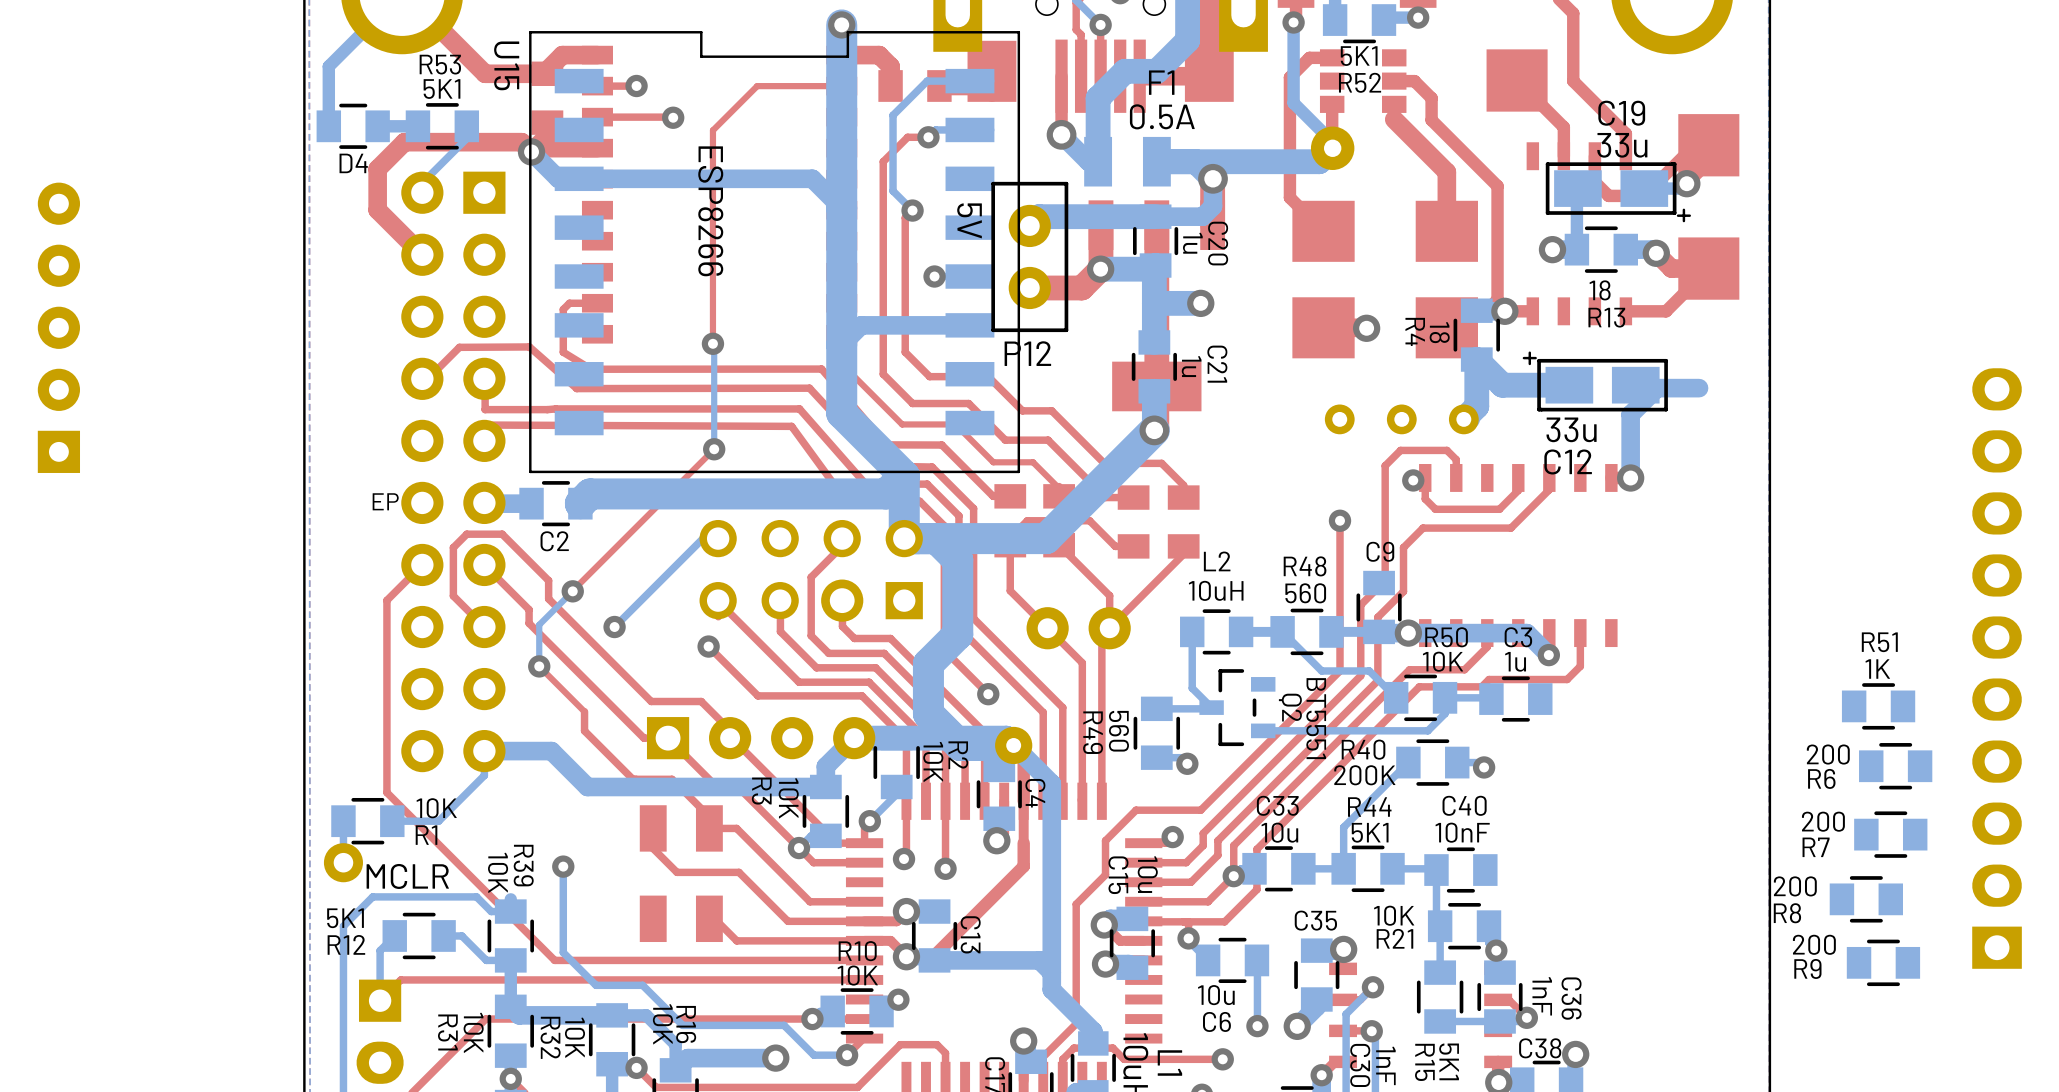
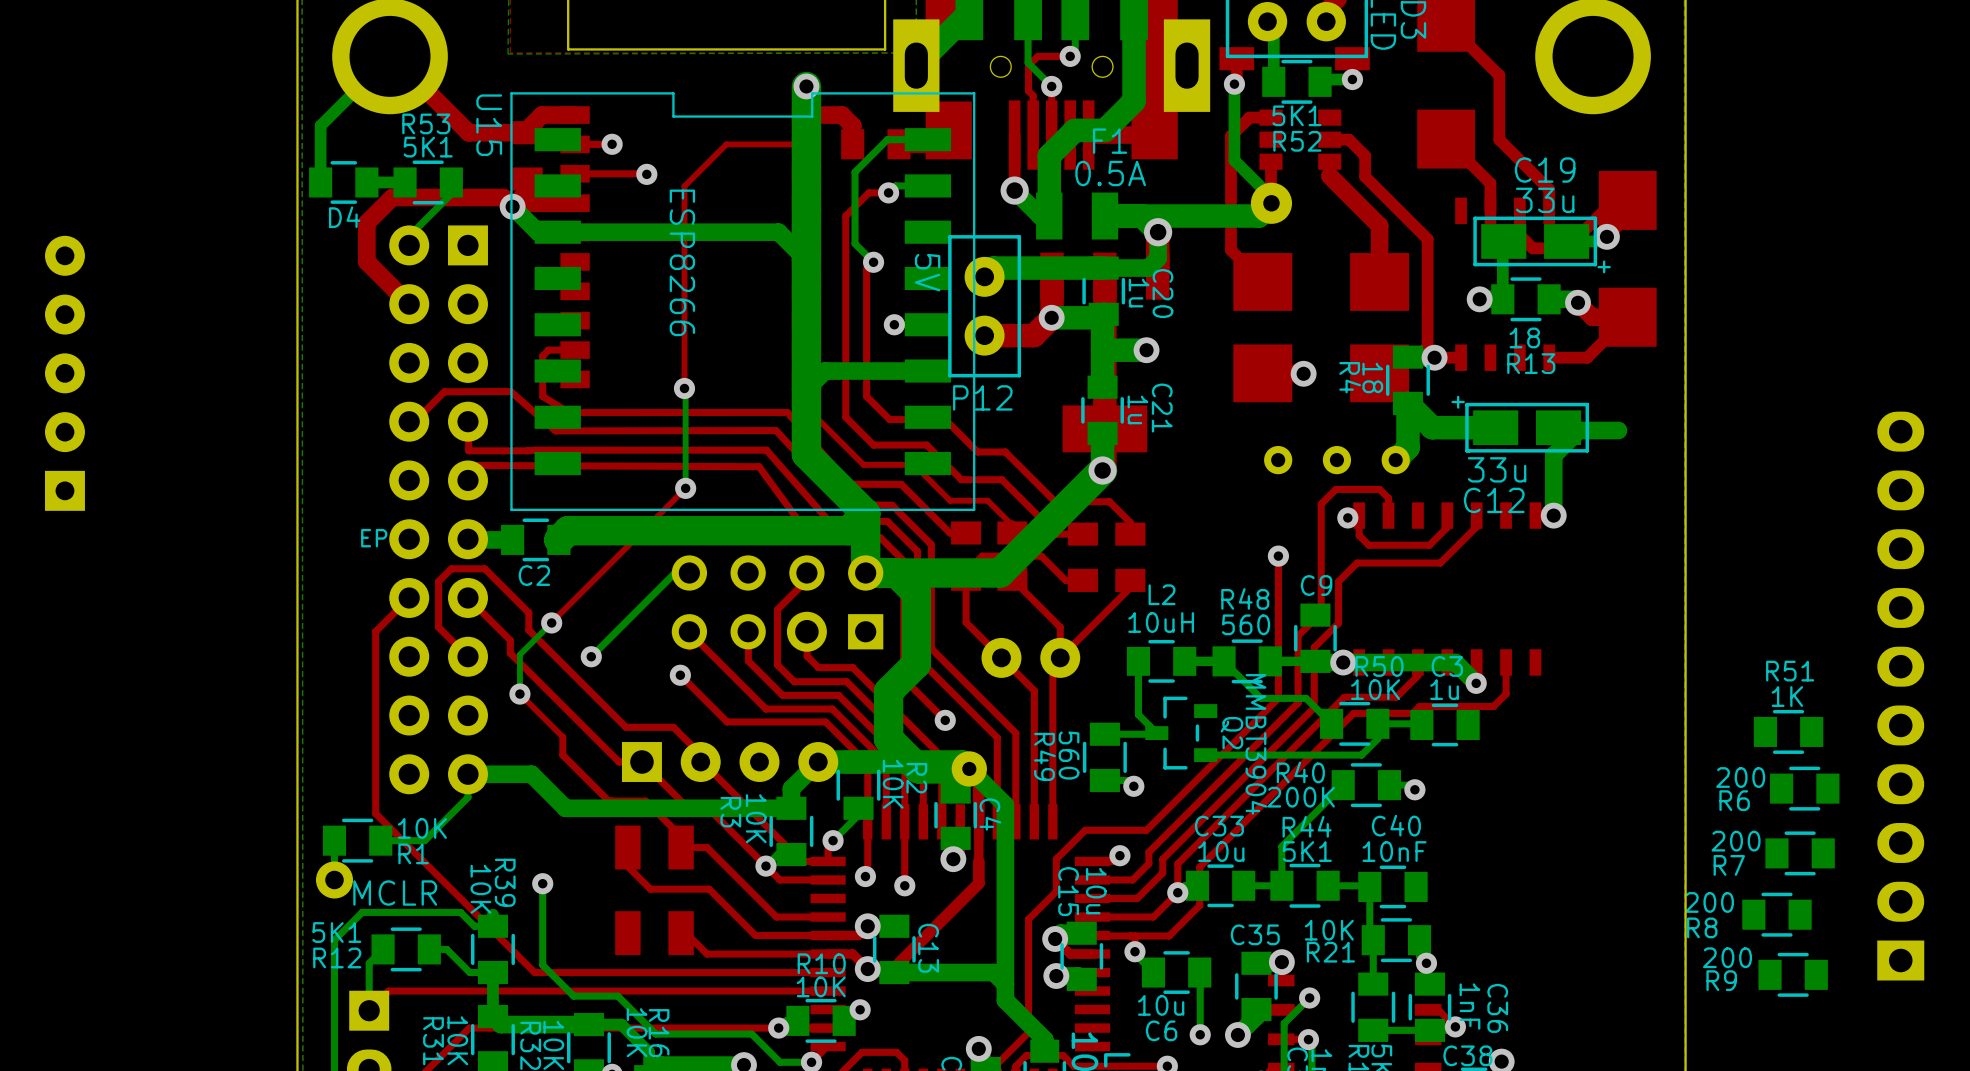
Q2 value: BT5551 (1316, 718) -> MMBT3904 (1256, 744)

